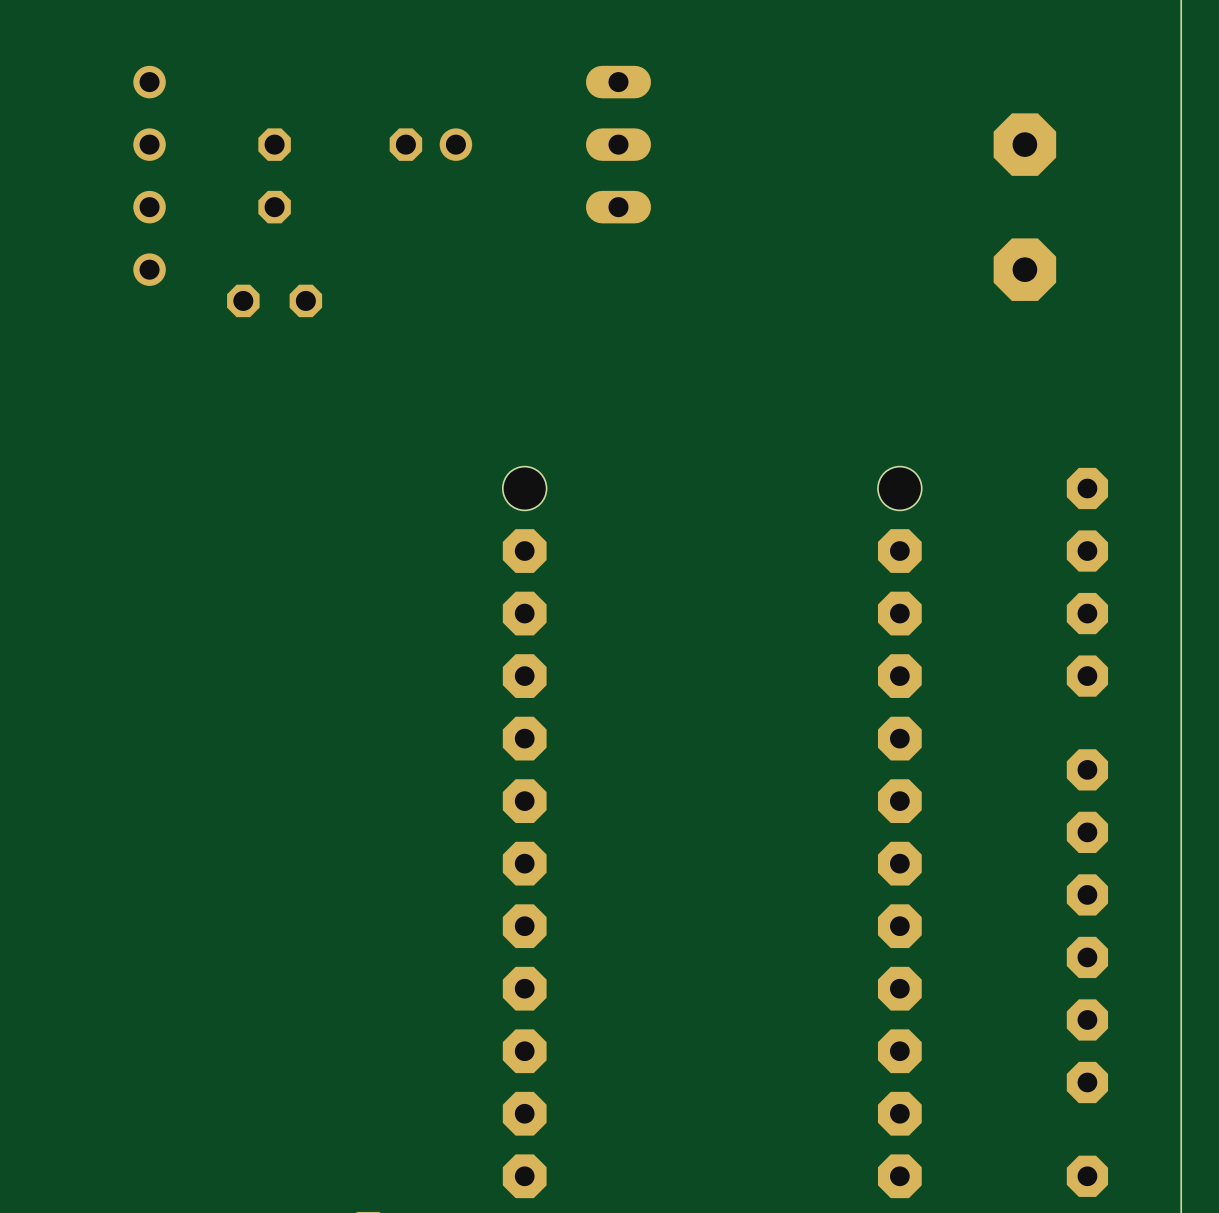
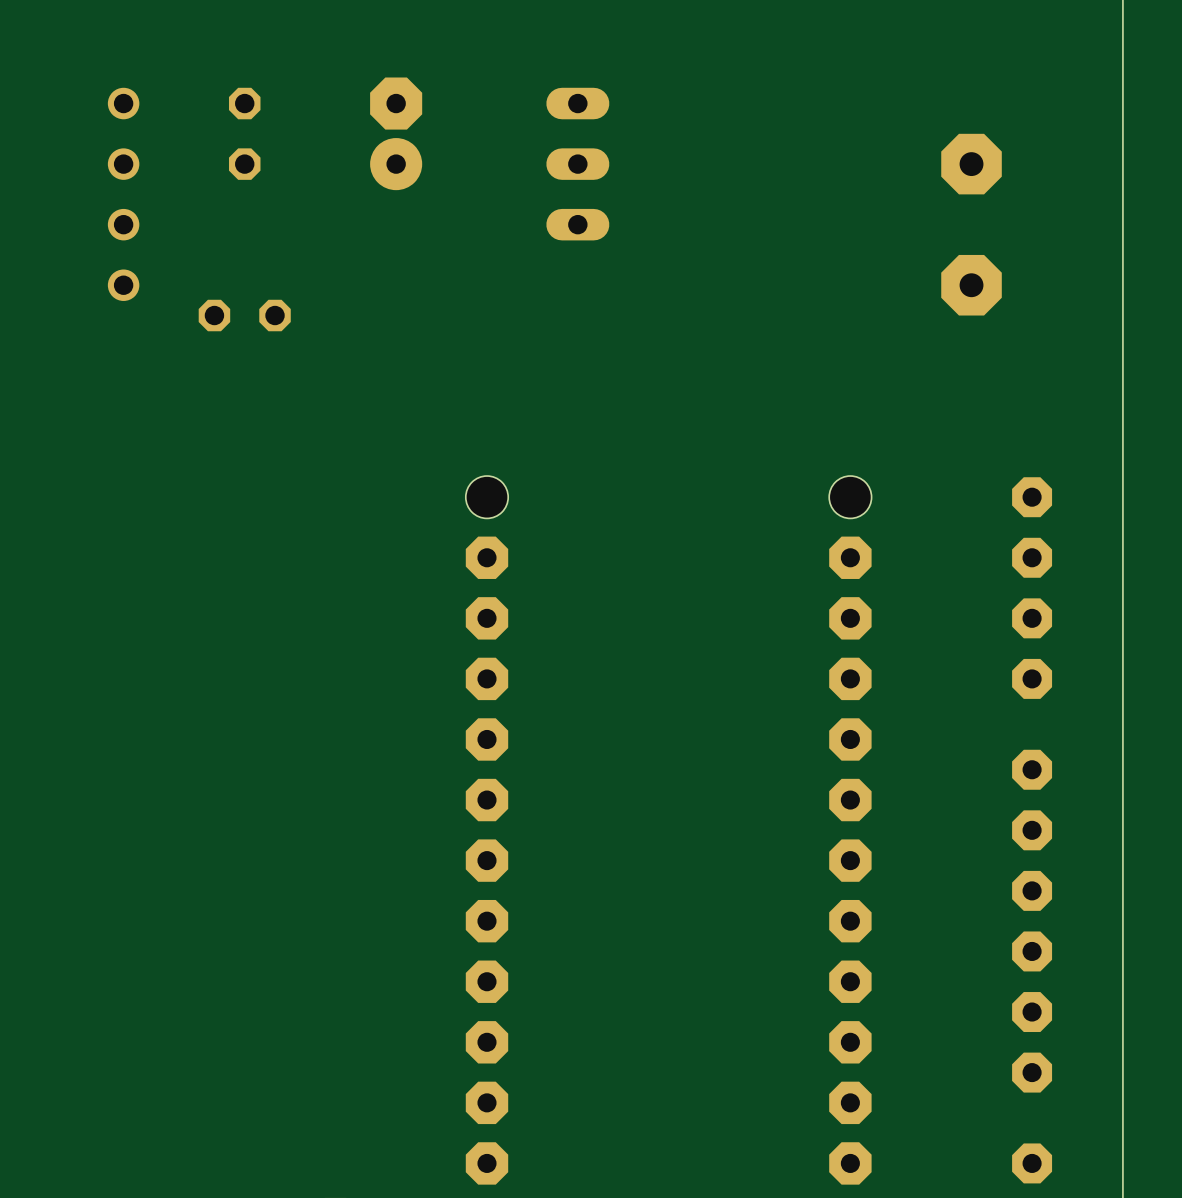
part: none -> (396, 133)
part: (430, 144) -> none
part position: (274, 175) -> (244, 133)

